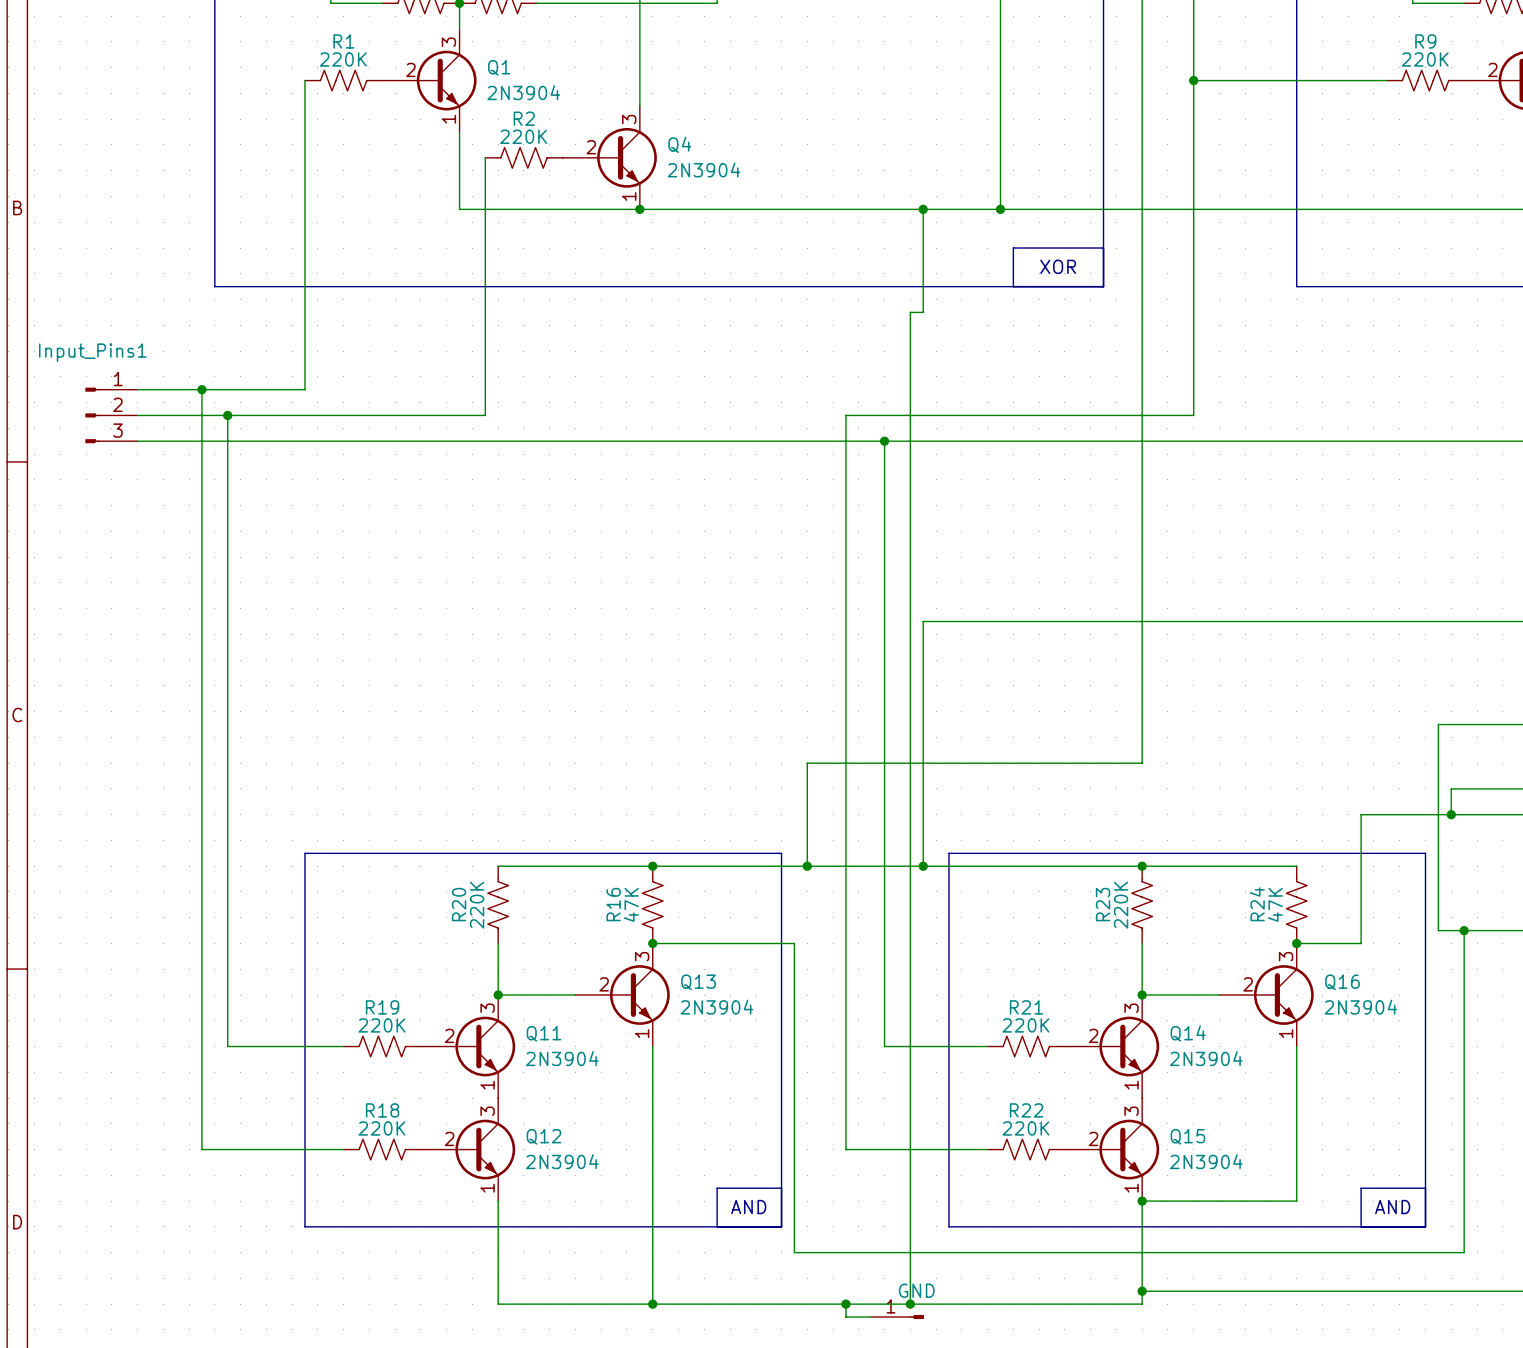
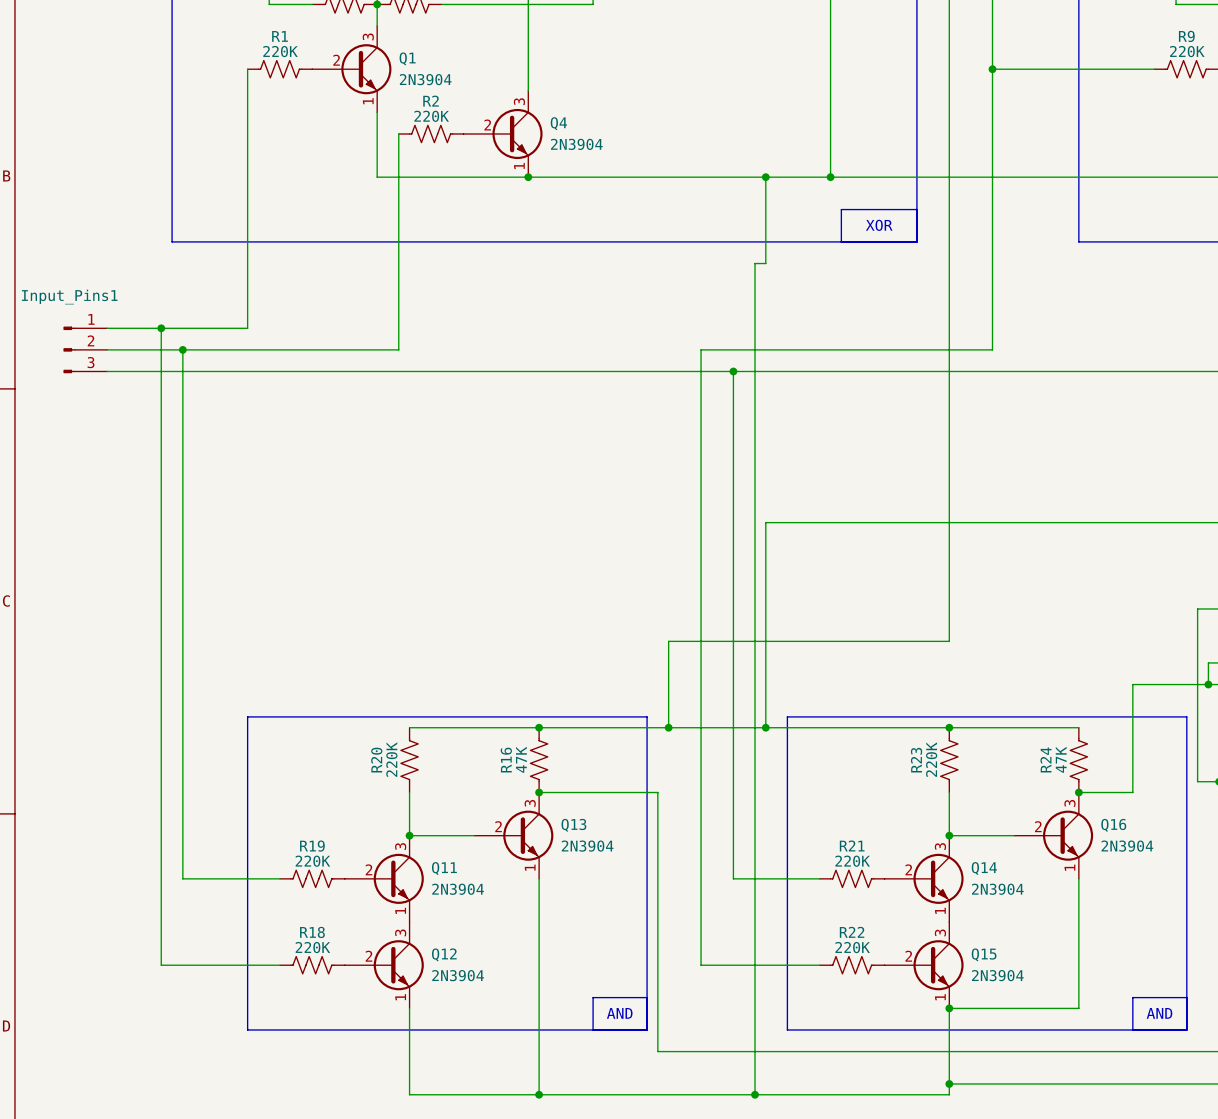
wire: (845, 1304) (845, 1317) (871, 1317) -> none
junction: (845, 1304) -> none
part: GND (897, 1317) -> none

